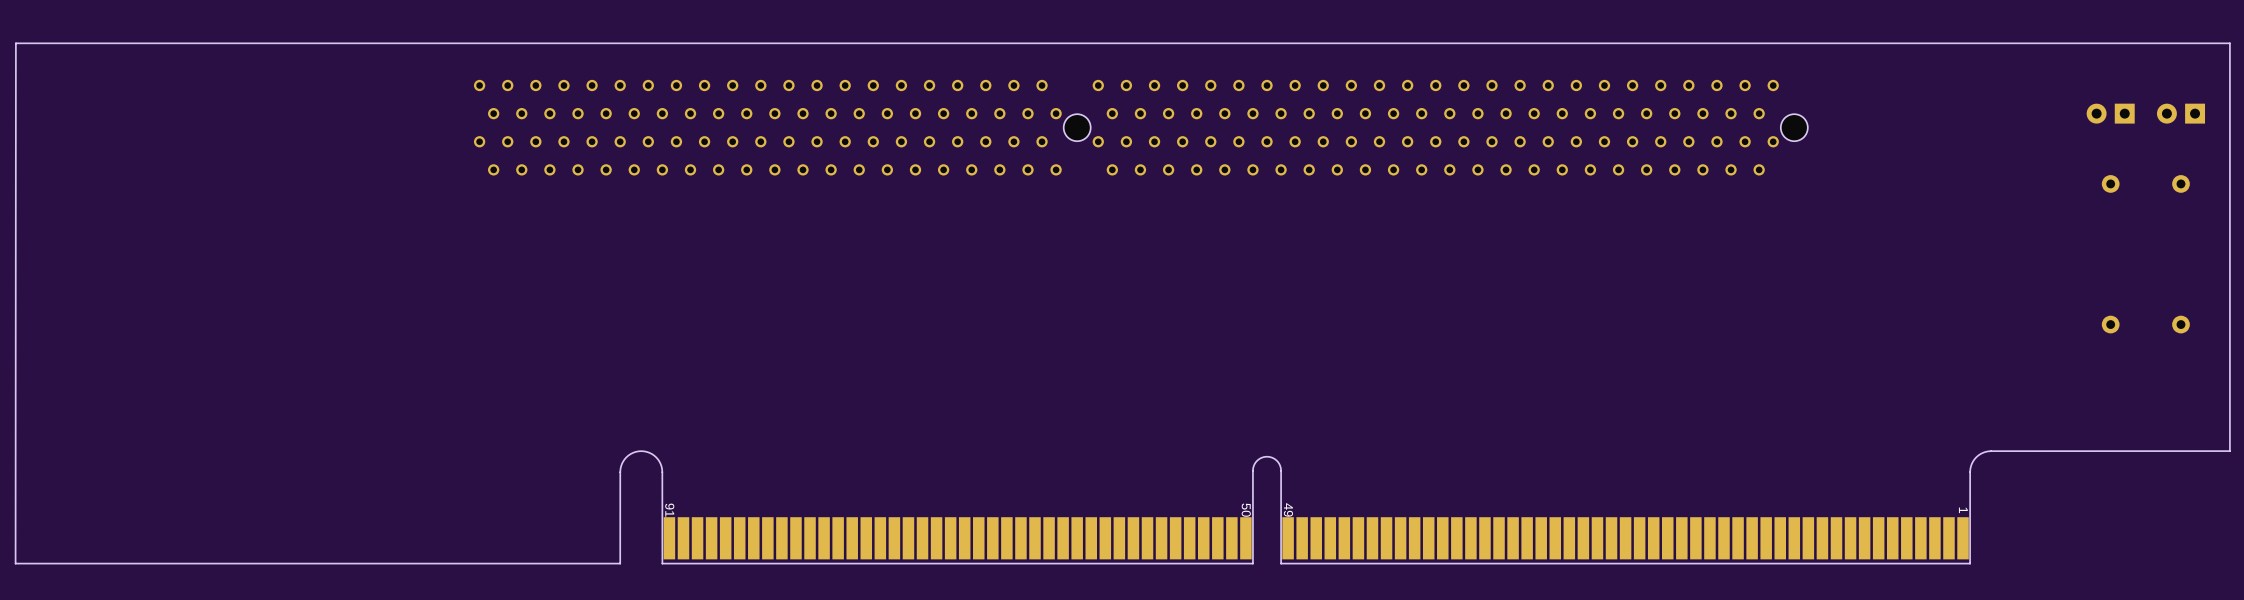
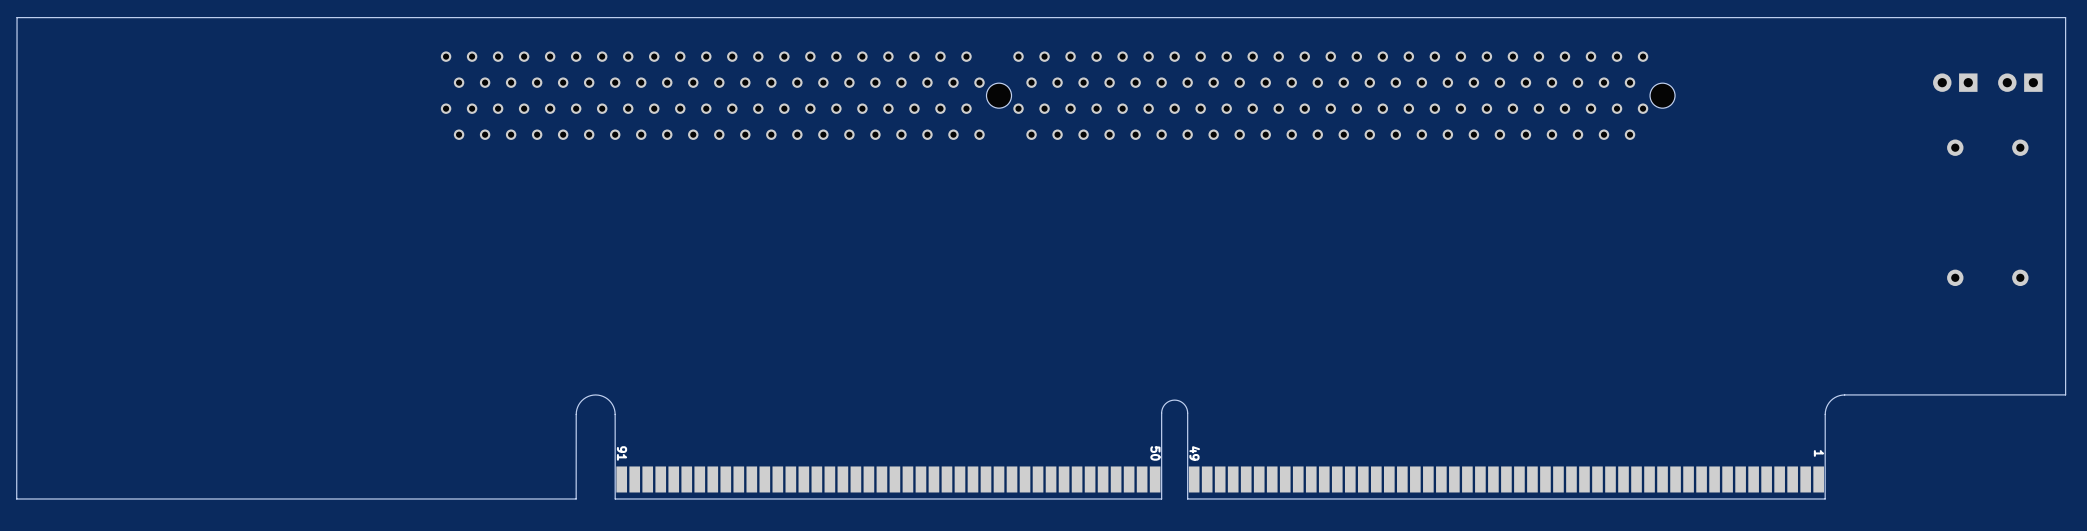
part footprint: [663, 517, 1969, 560] -> [616, 466, 1824, 493]

